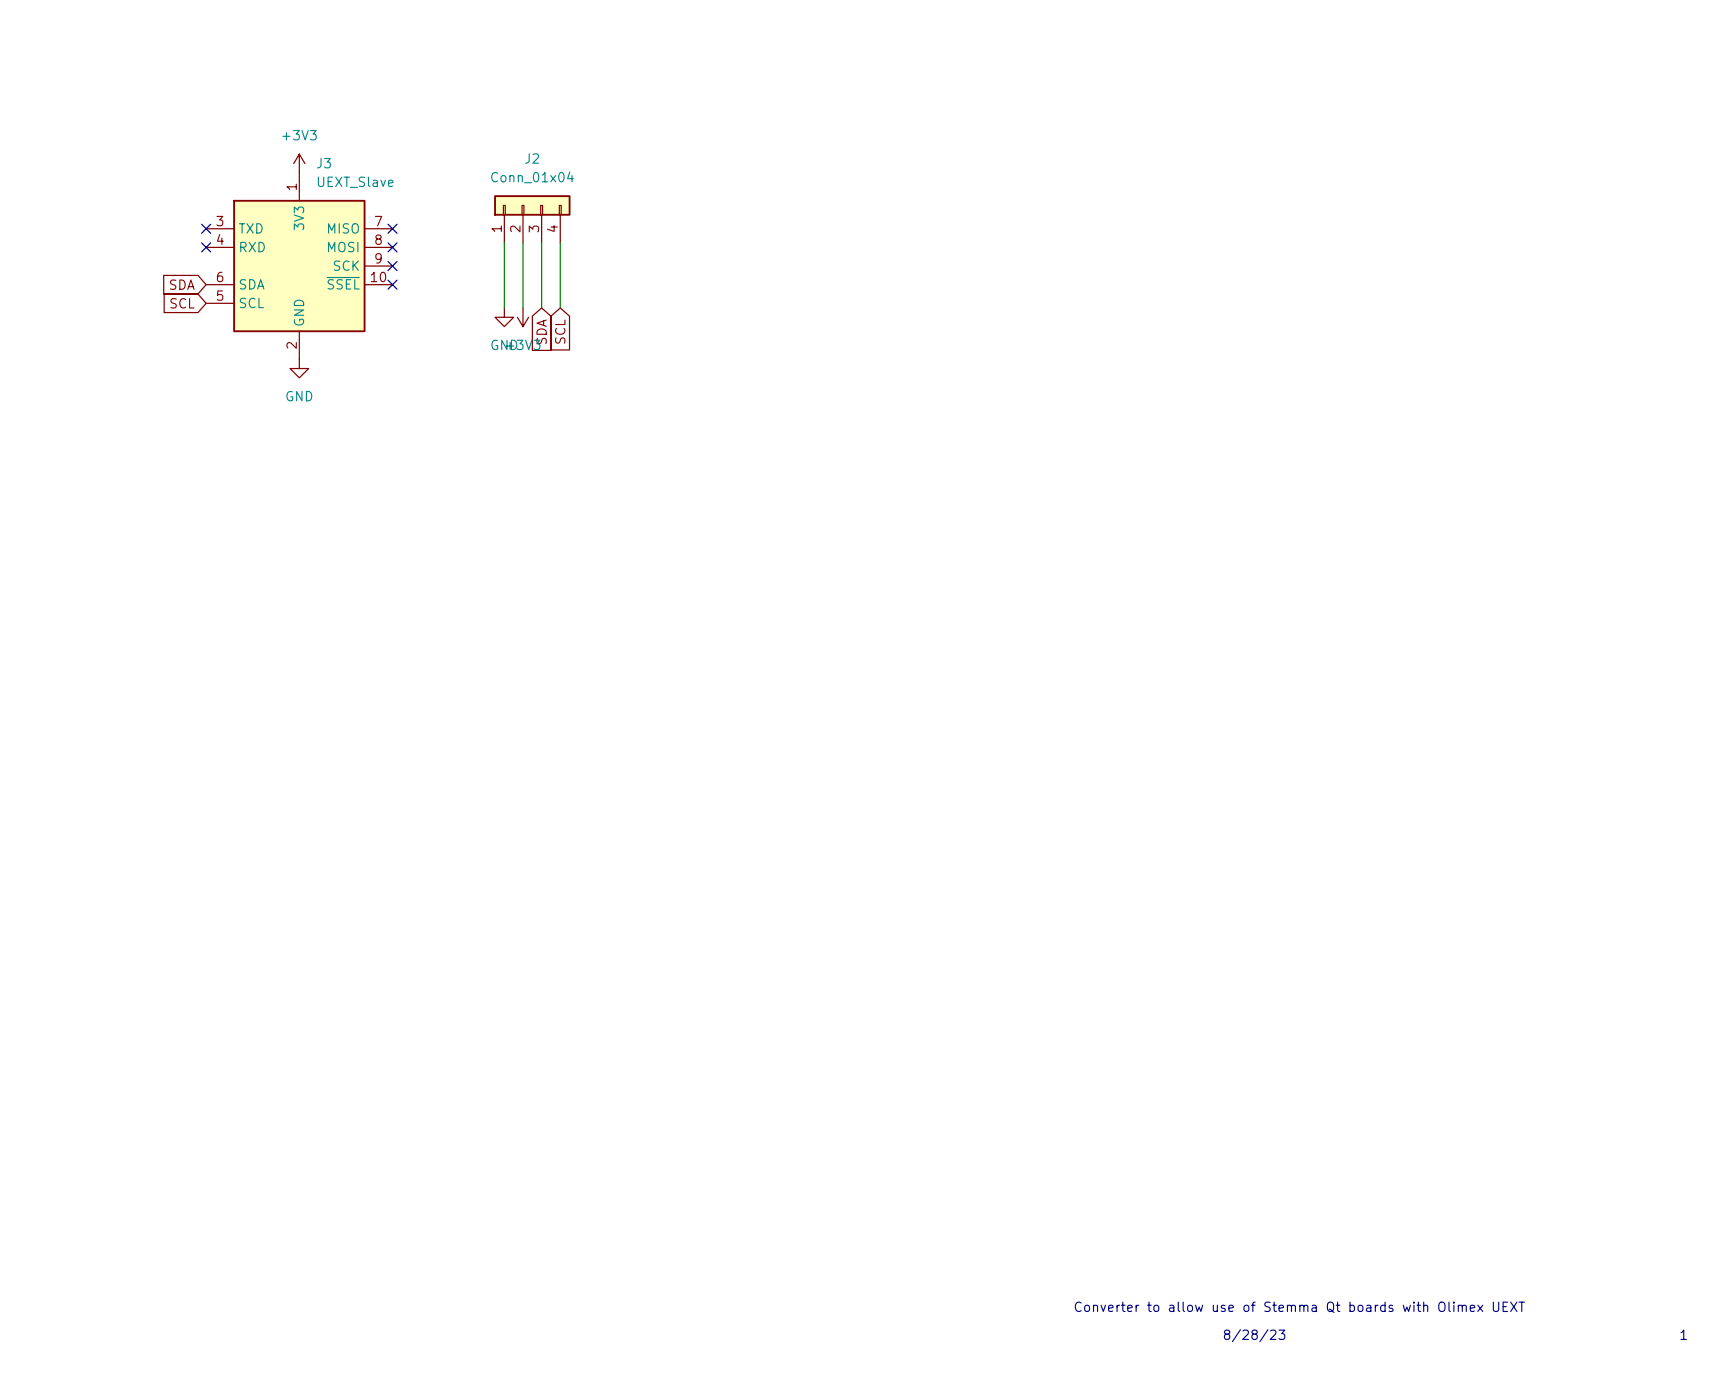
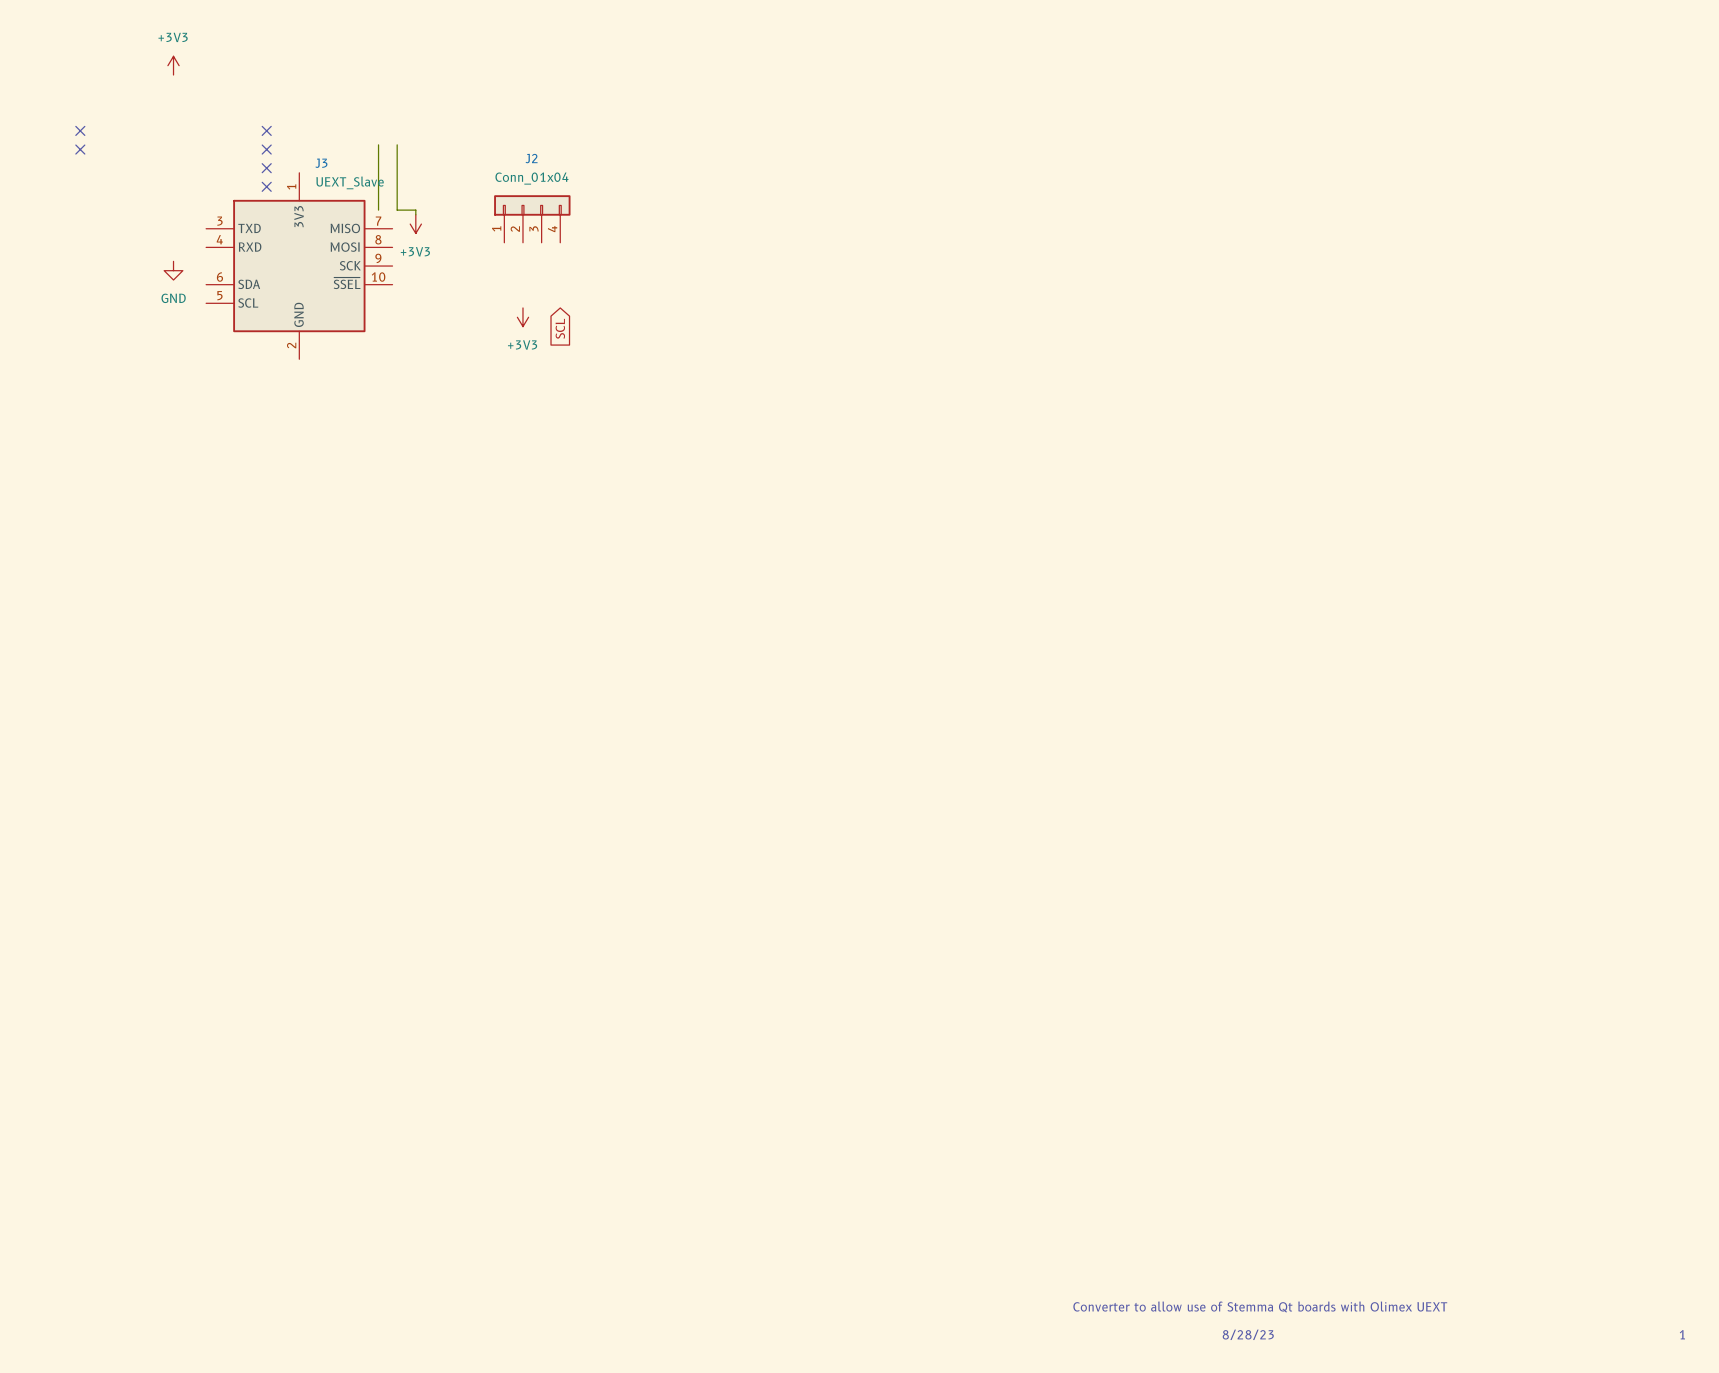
power symbol: none -> +3V3 (173, 65)
no-connect mark: none -> (80, 130)
no-connect mark: none -> (266, 130)
wire: none -> (397, 144) (397, 210) (415, 210) (415, 214)
no-connect mark: none -> (80, 149)
no-connect mark: none -> (266, 149)
power symbol: +3V3 (299, 163) -> none
no-connect mark: none -> (266, 168)
no-connect mark: none -> (266, 186)
power symbol: none -> +3V3 (415, 224)
no-connect mark: (206, 228) -> none
no-connect mark: (392, 228) -> none
wire: (504, 242) (504, 307) -> (378, 144) (378, 210)
wire: (522, 242) (522, 307) -> none
wire: (541, 242) (541, 307) -> none
wire: (560, 242) (560, 307) -> none
no-connect mark: (206, 247) -> none
no-connect mark: (392, 247) -> none
no-connect mark: (392, 266) -> none
global label: SDA (182, 284) -> none
no-connect mark: (392, 284) -> none
global label: SCL (182, 303) -> none
power symbol: GND (504, 317) -> none
global label: SDA (541, 331) -> none
power symbol position: GND (299, 368) -> GND (173, 270)

